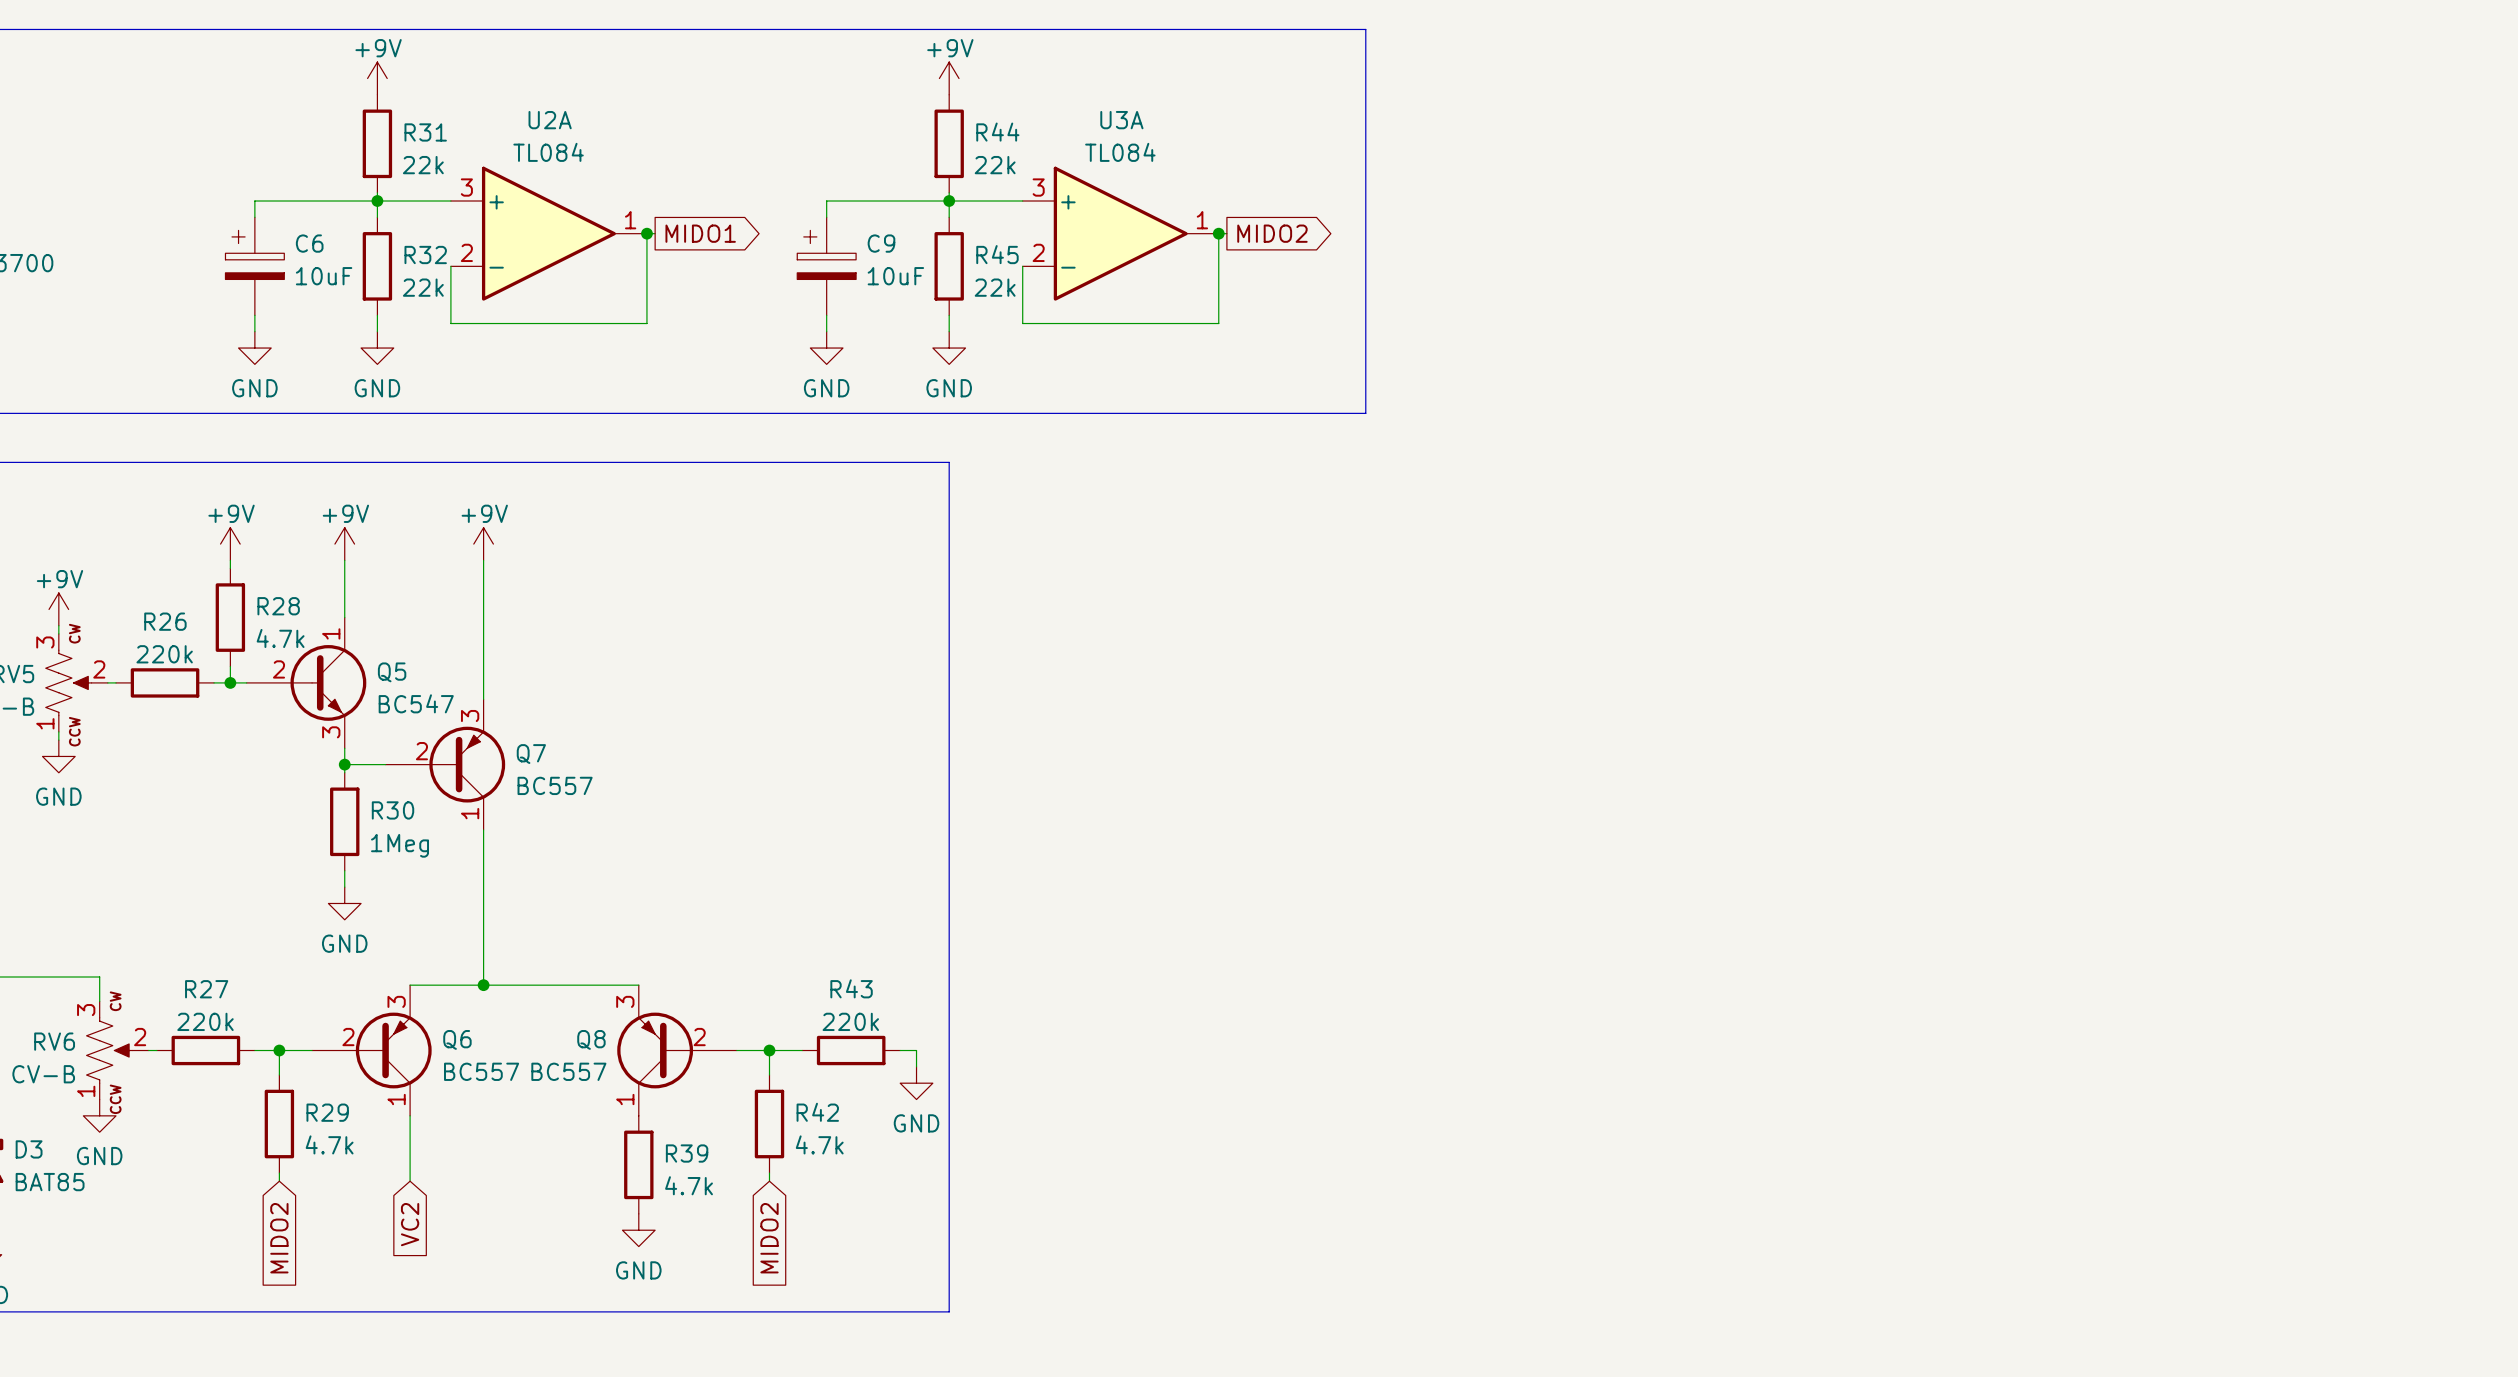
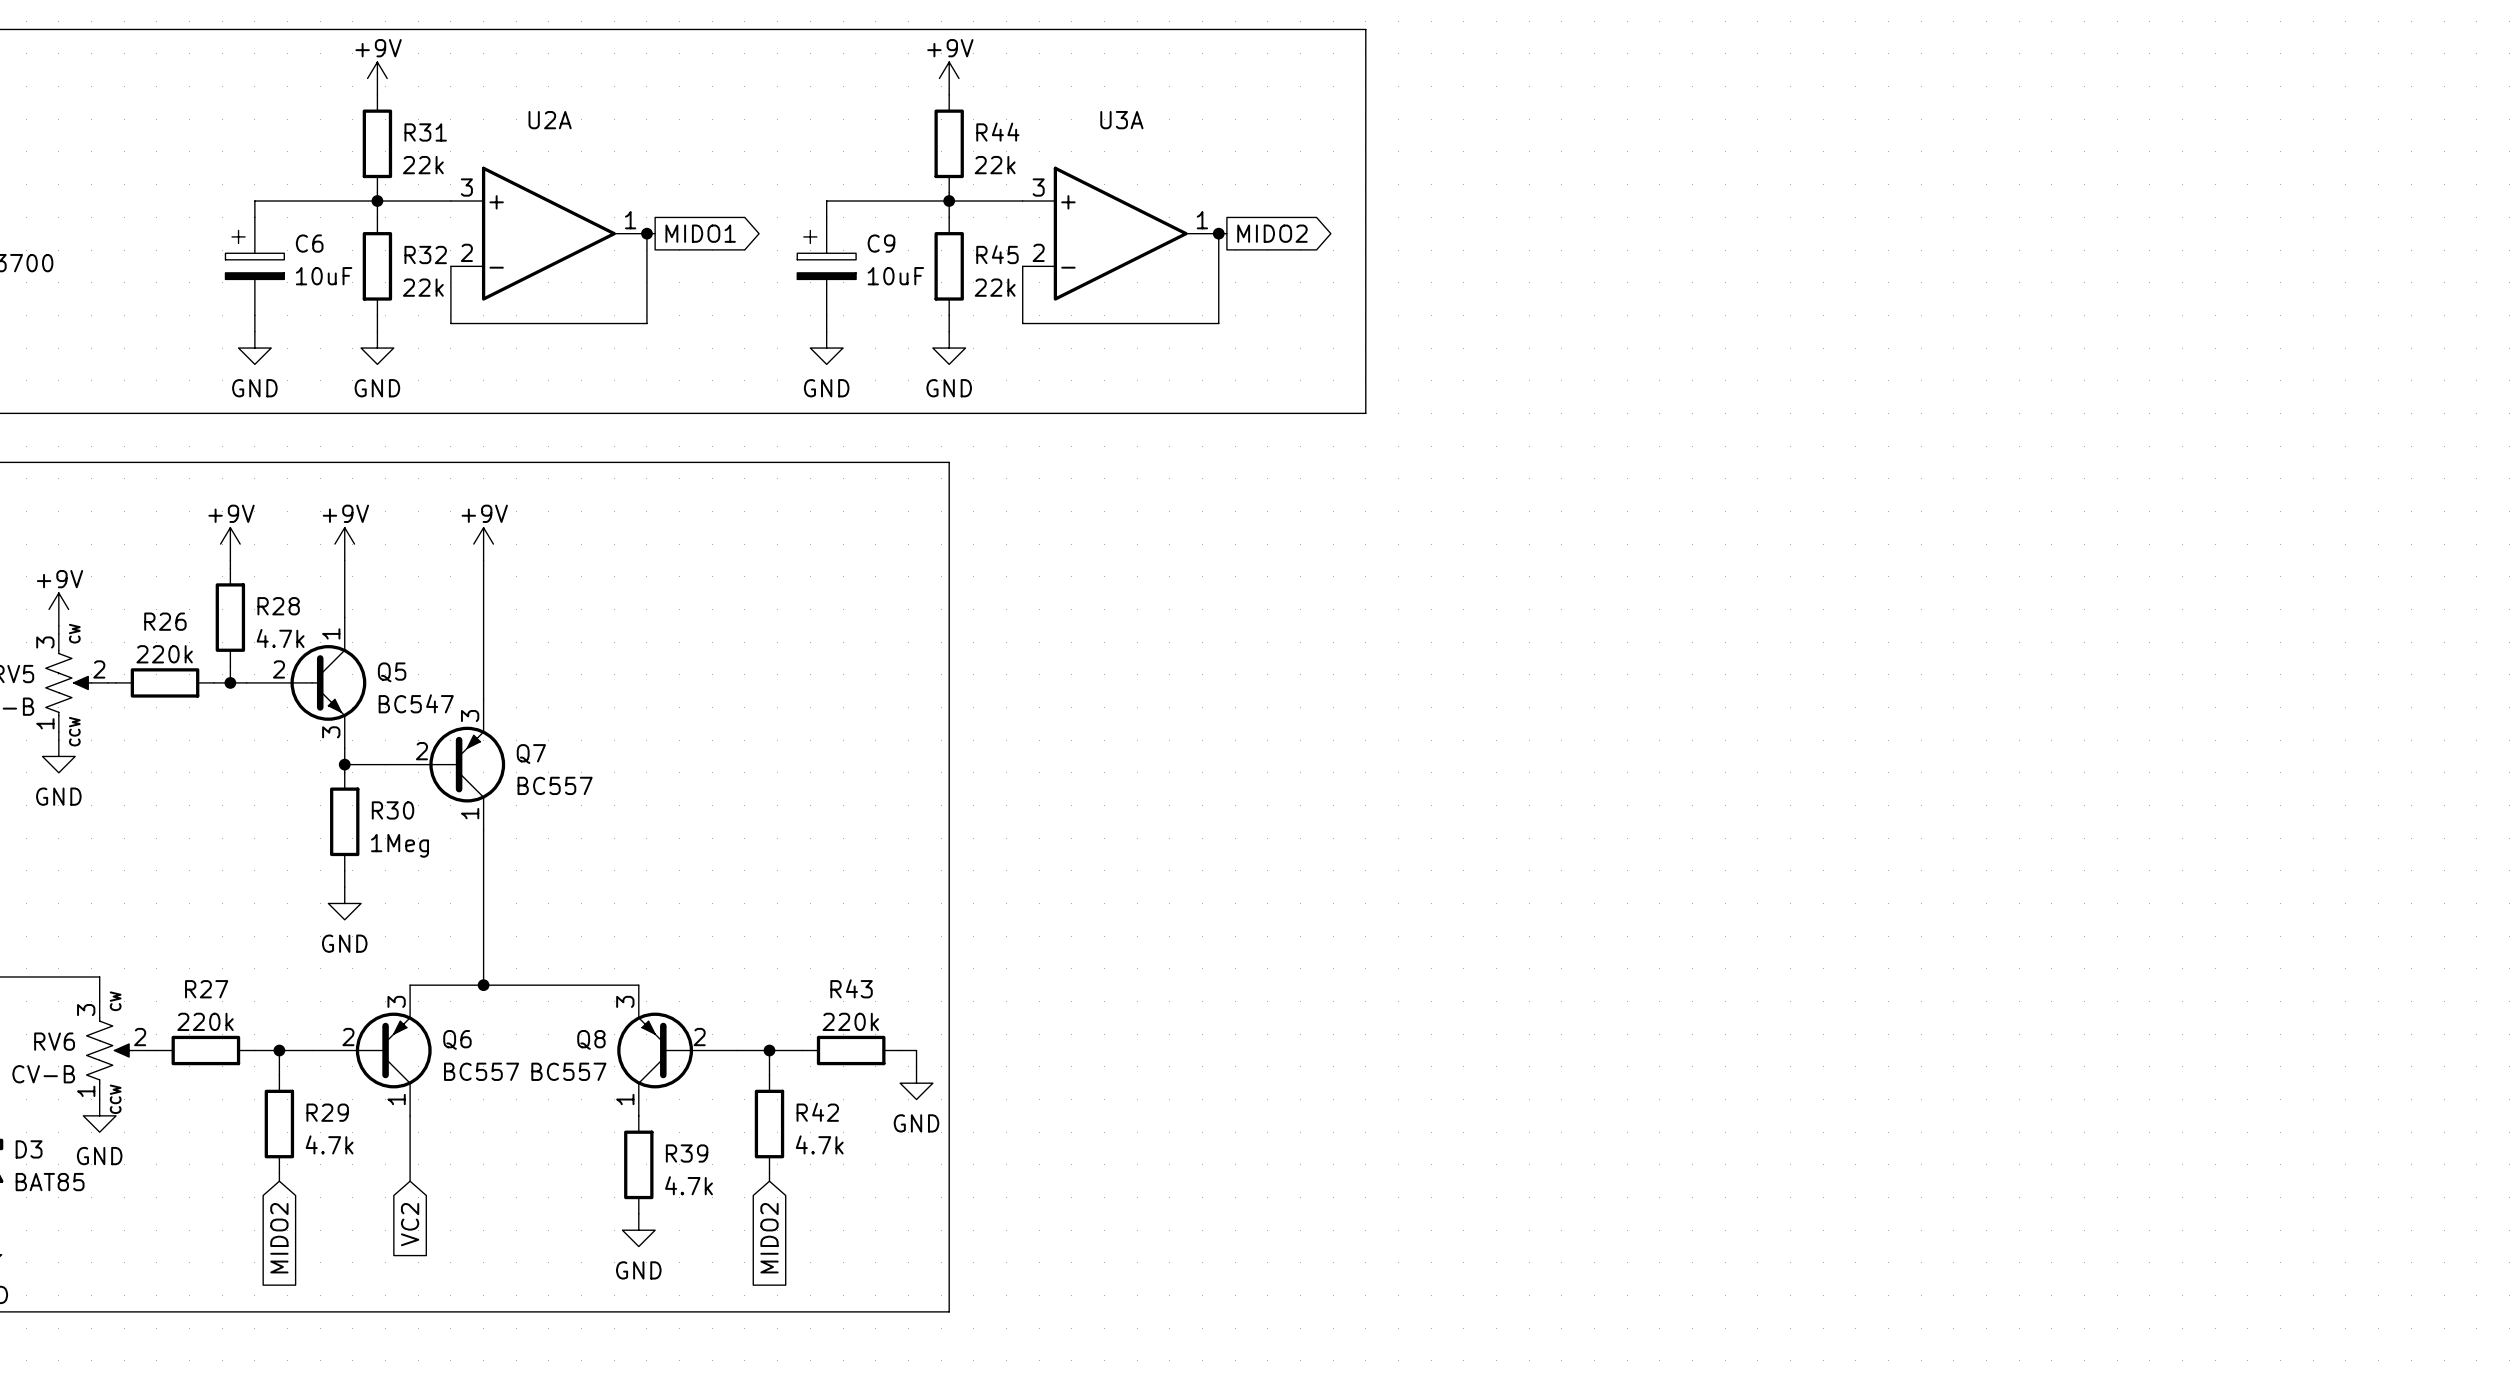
U2A value: TL084 (548, 152) -> none
U3A value: TL084 (1120, 152) -> none

